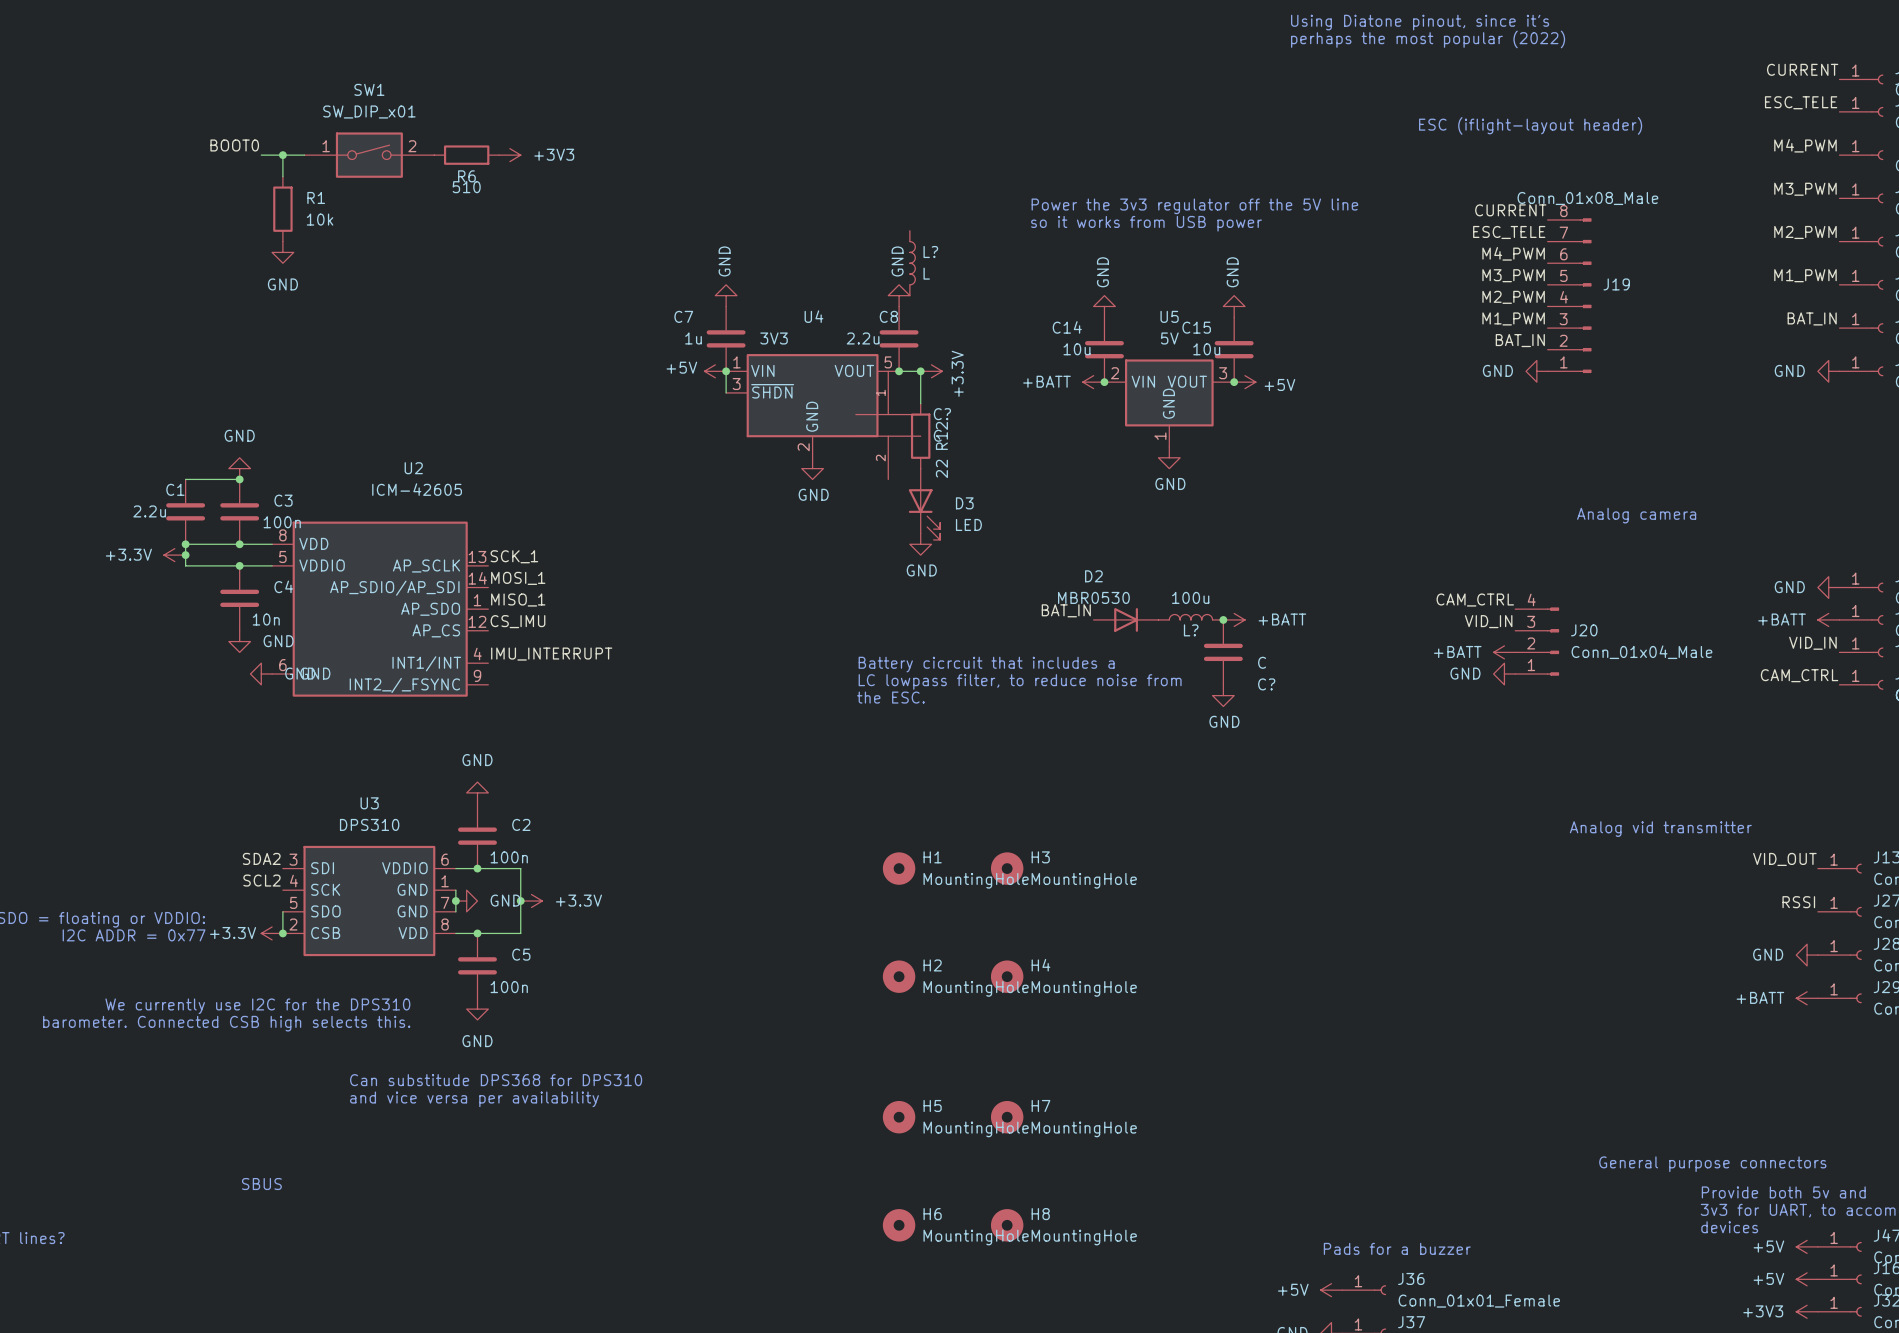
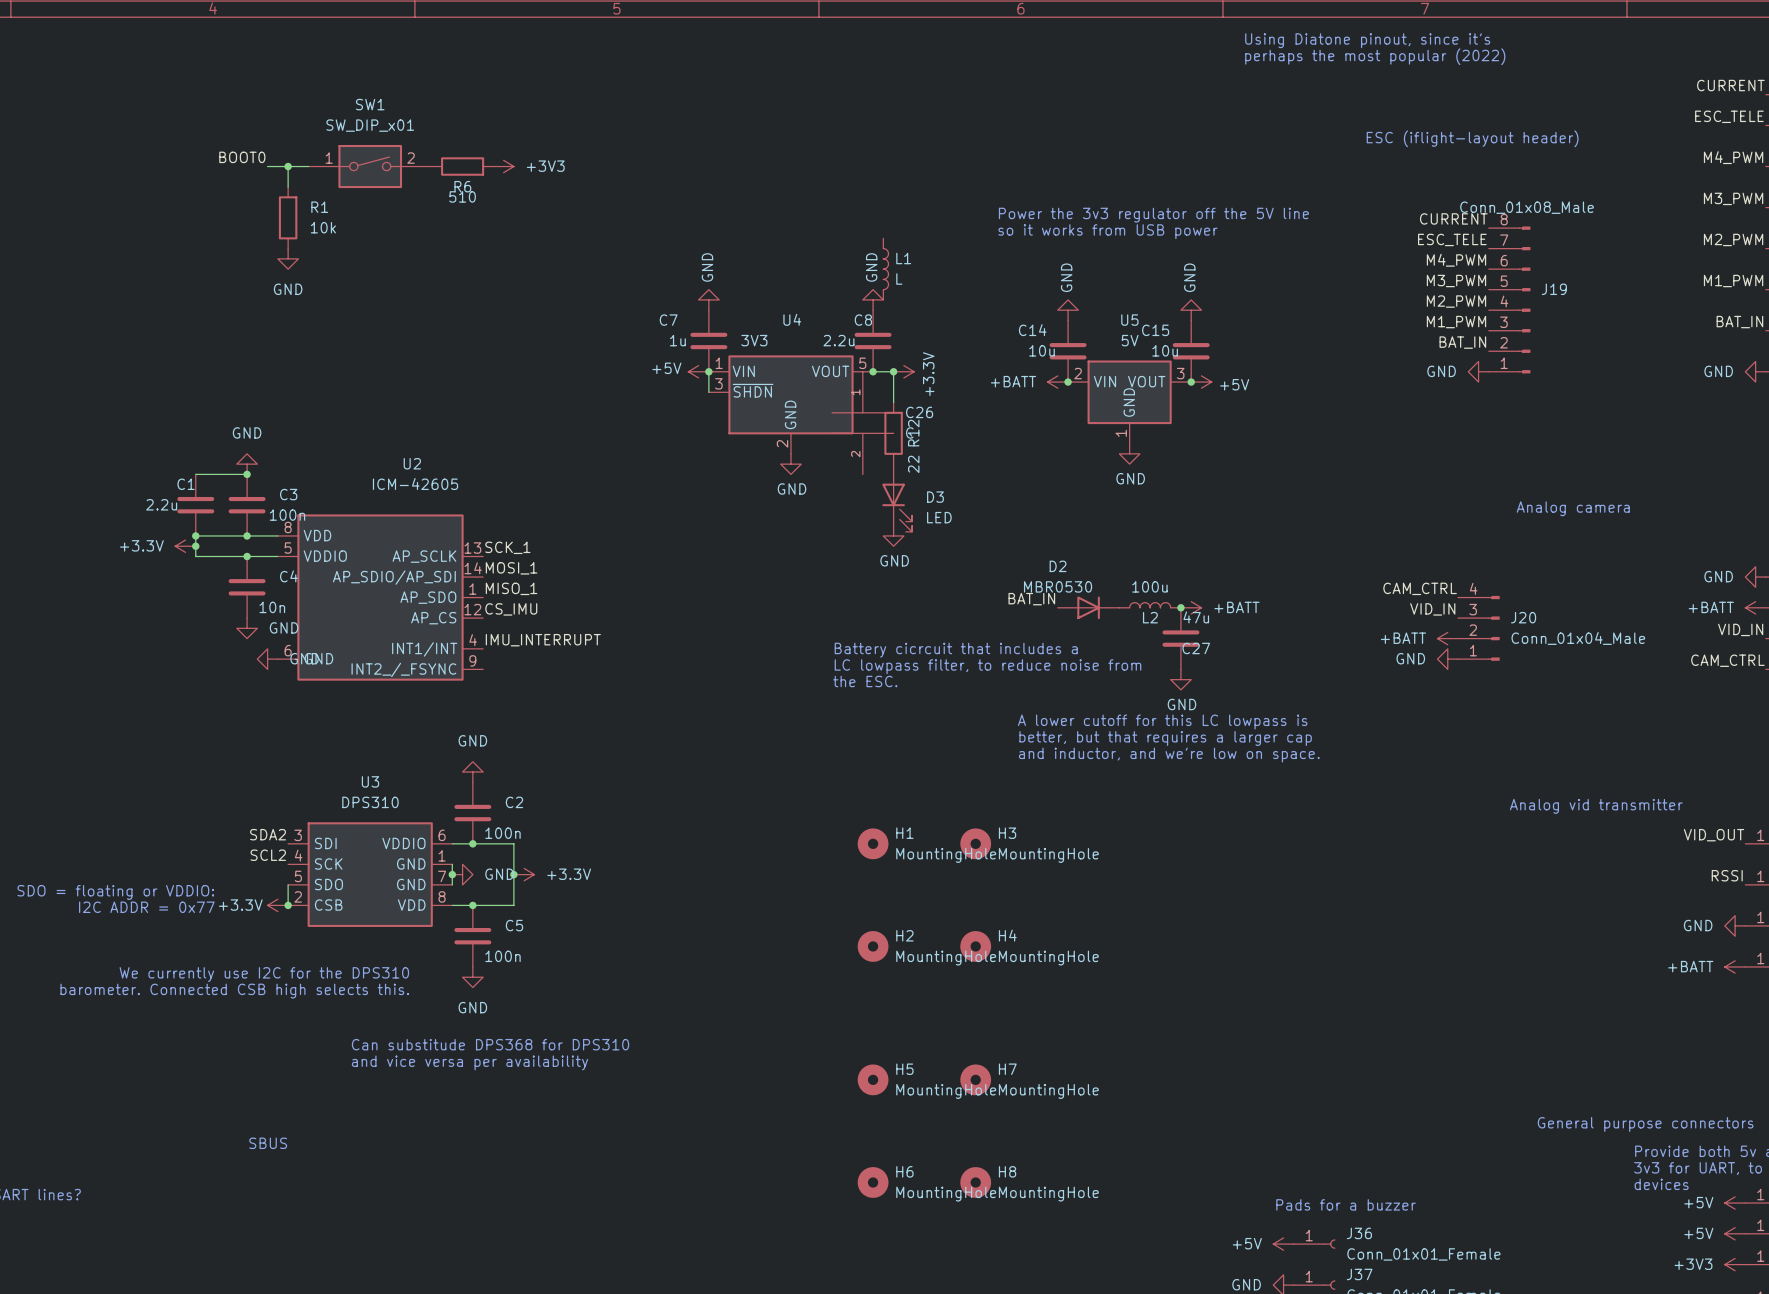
L? name: L? (930, 252) -> L1 (903, 258)
C? name: C? (942, 414) -> C26 (919, 412)
L? name: L? (1191, 630) -> L2 (1150, 617)
C? value: C (1262, 662) -> 47u (1196, 617)
C? name: C? (1266, 684) -> C27 (1196, 648)
text: none -> A lower cutoff for this LC lowpass is (1162, 722)
text: none -> better, but that requires a larger cap (1165, 738)
text: none -> and inductor, and we're low on space. (1169, 755)

